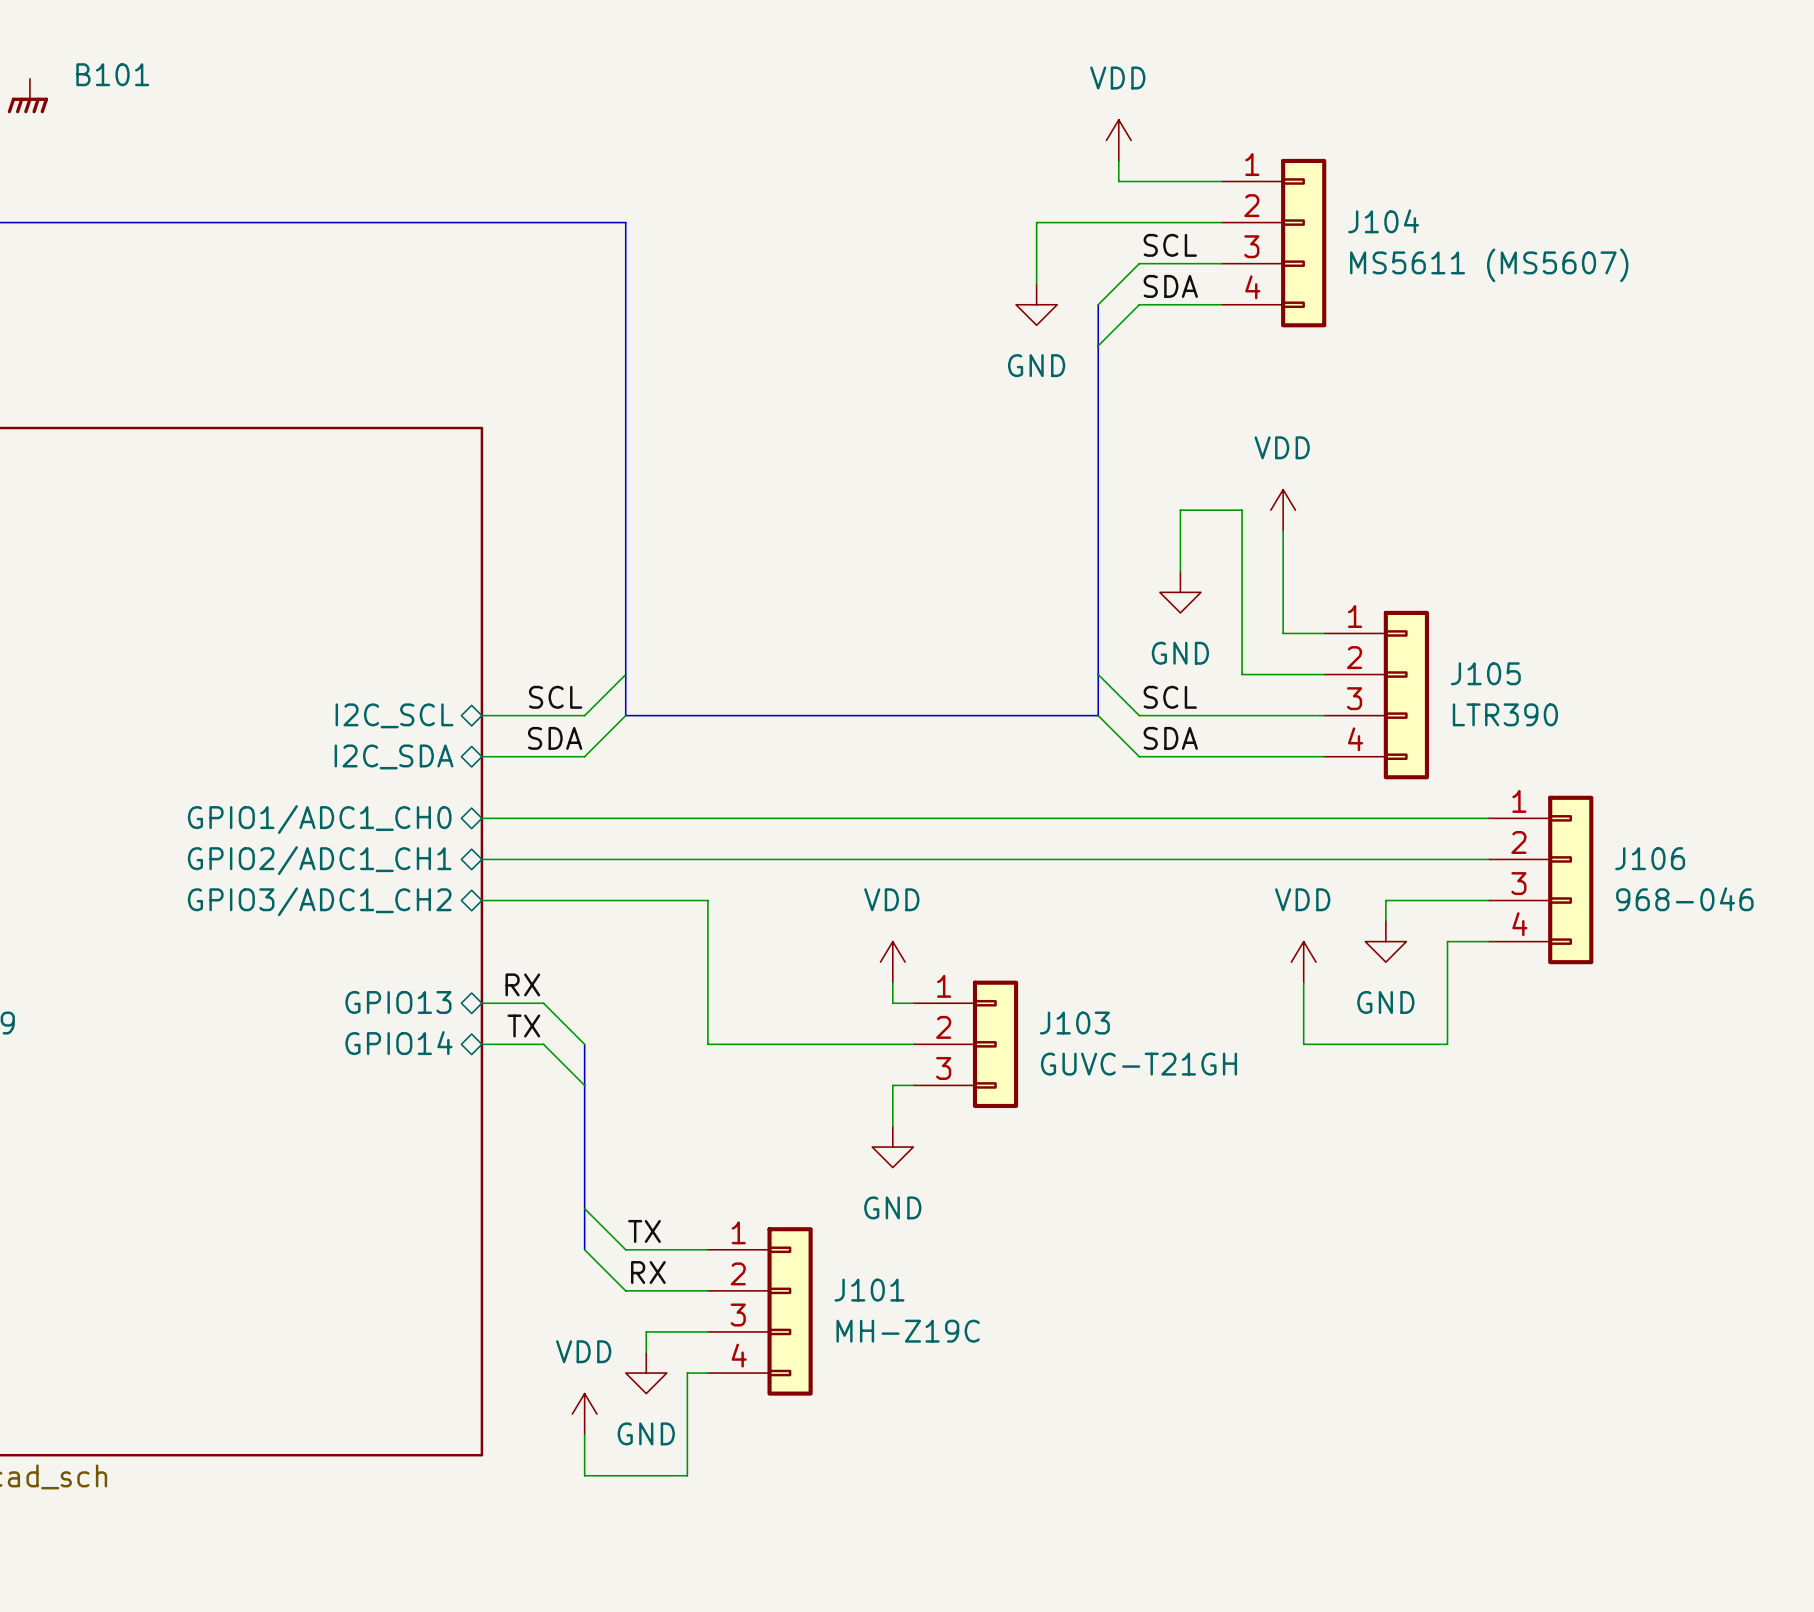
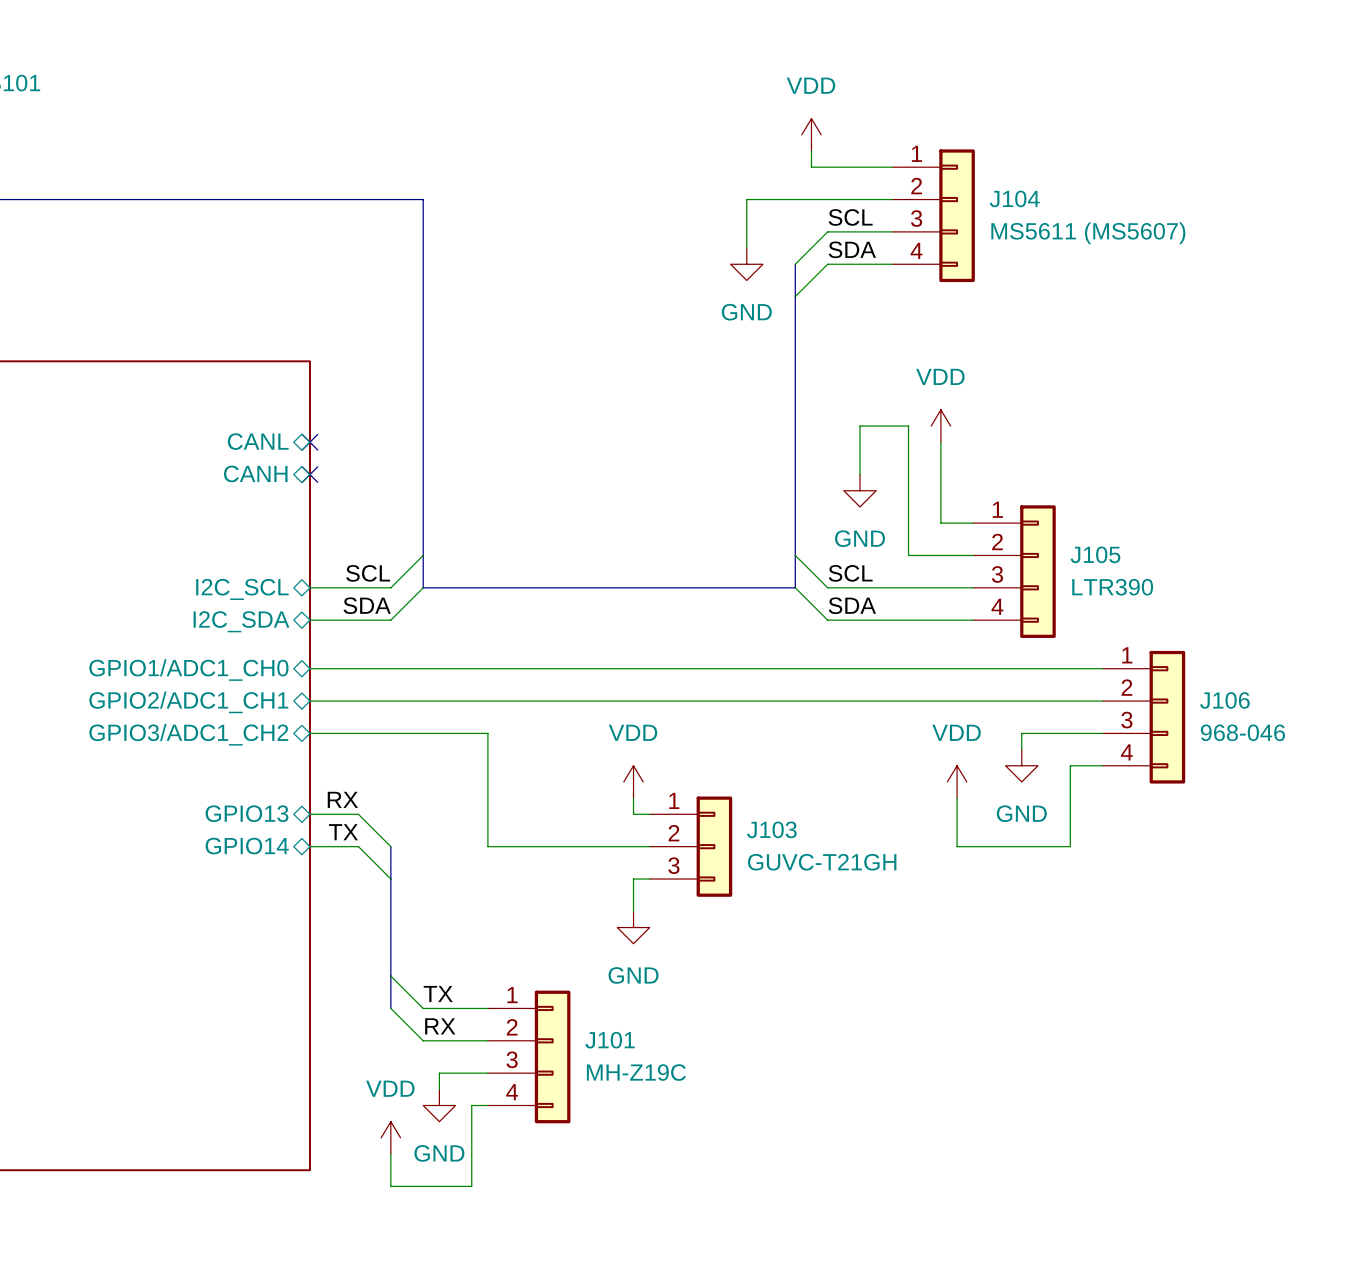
sheet pin: none -> CANL (258, 441)
no-connect mark: none -> (309, 442)
sheet pin: none -> CANH (255, 473)
no-connect mark: none -> (309, 474)

